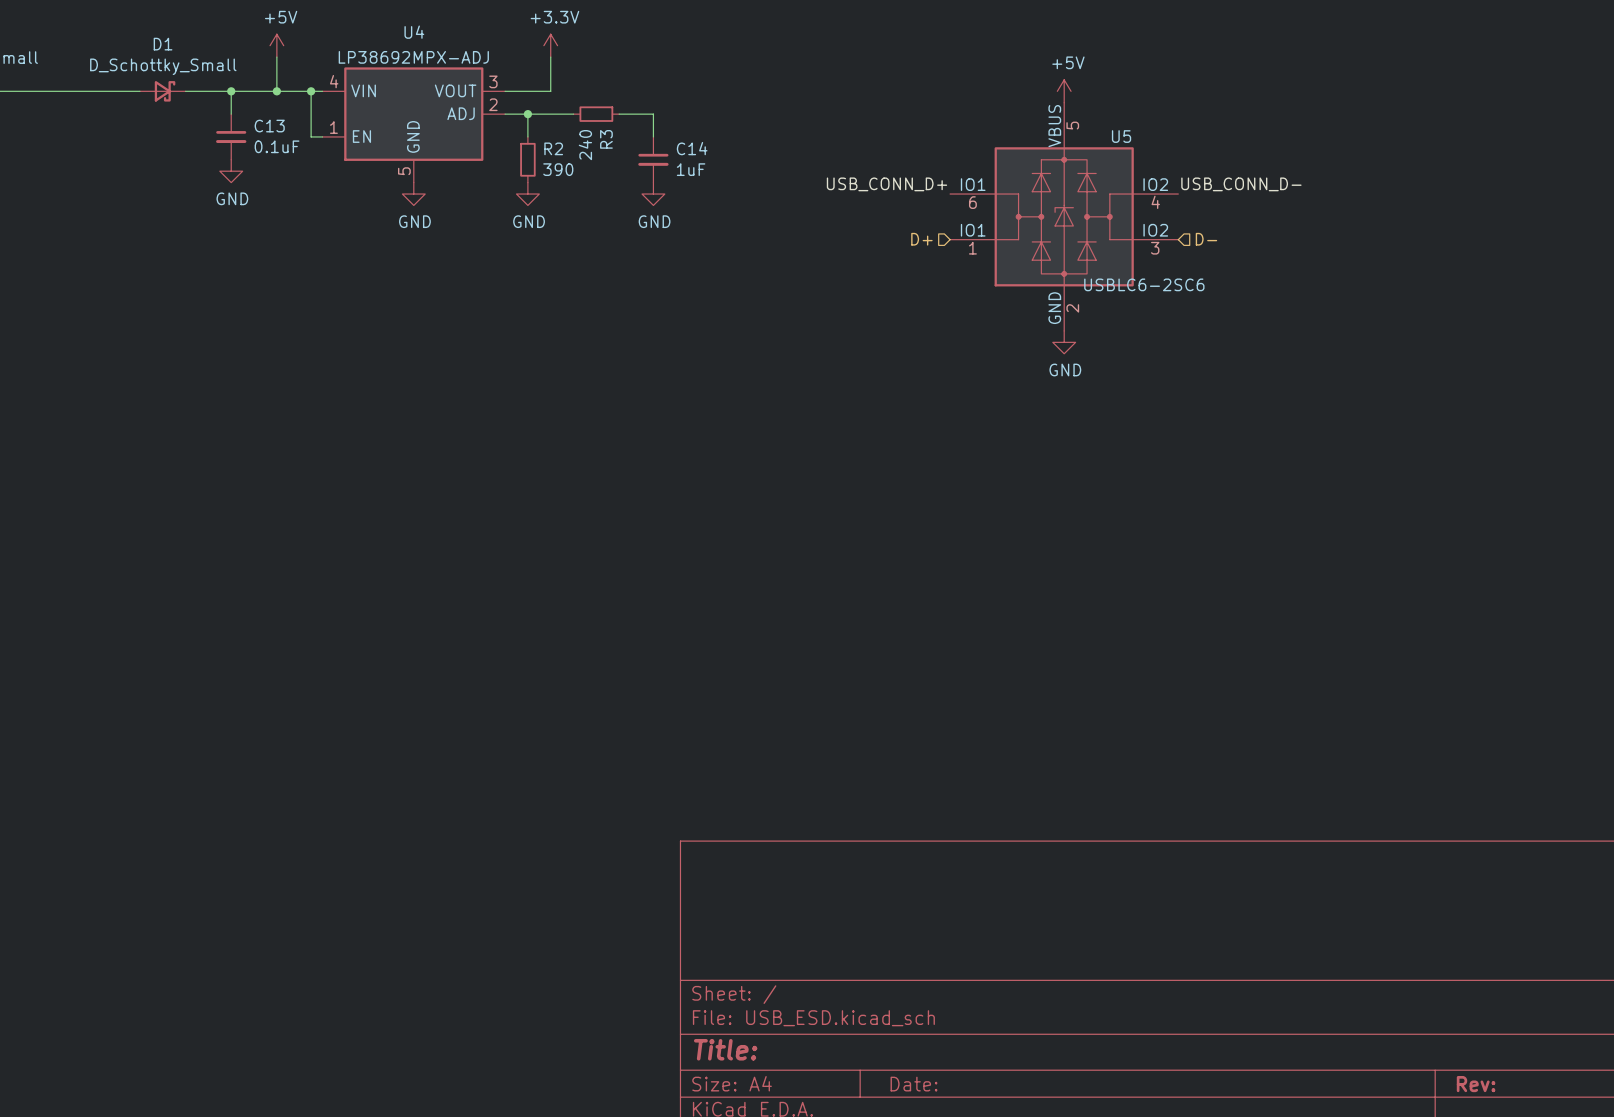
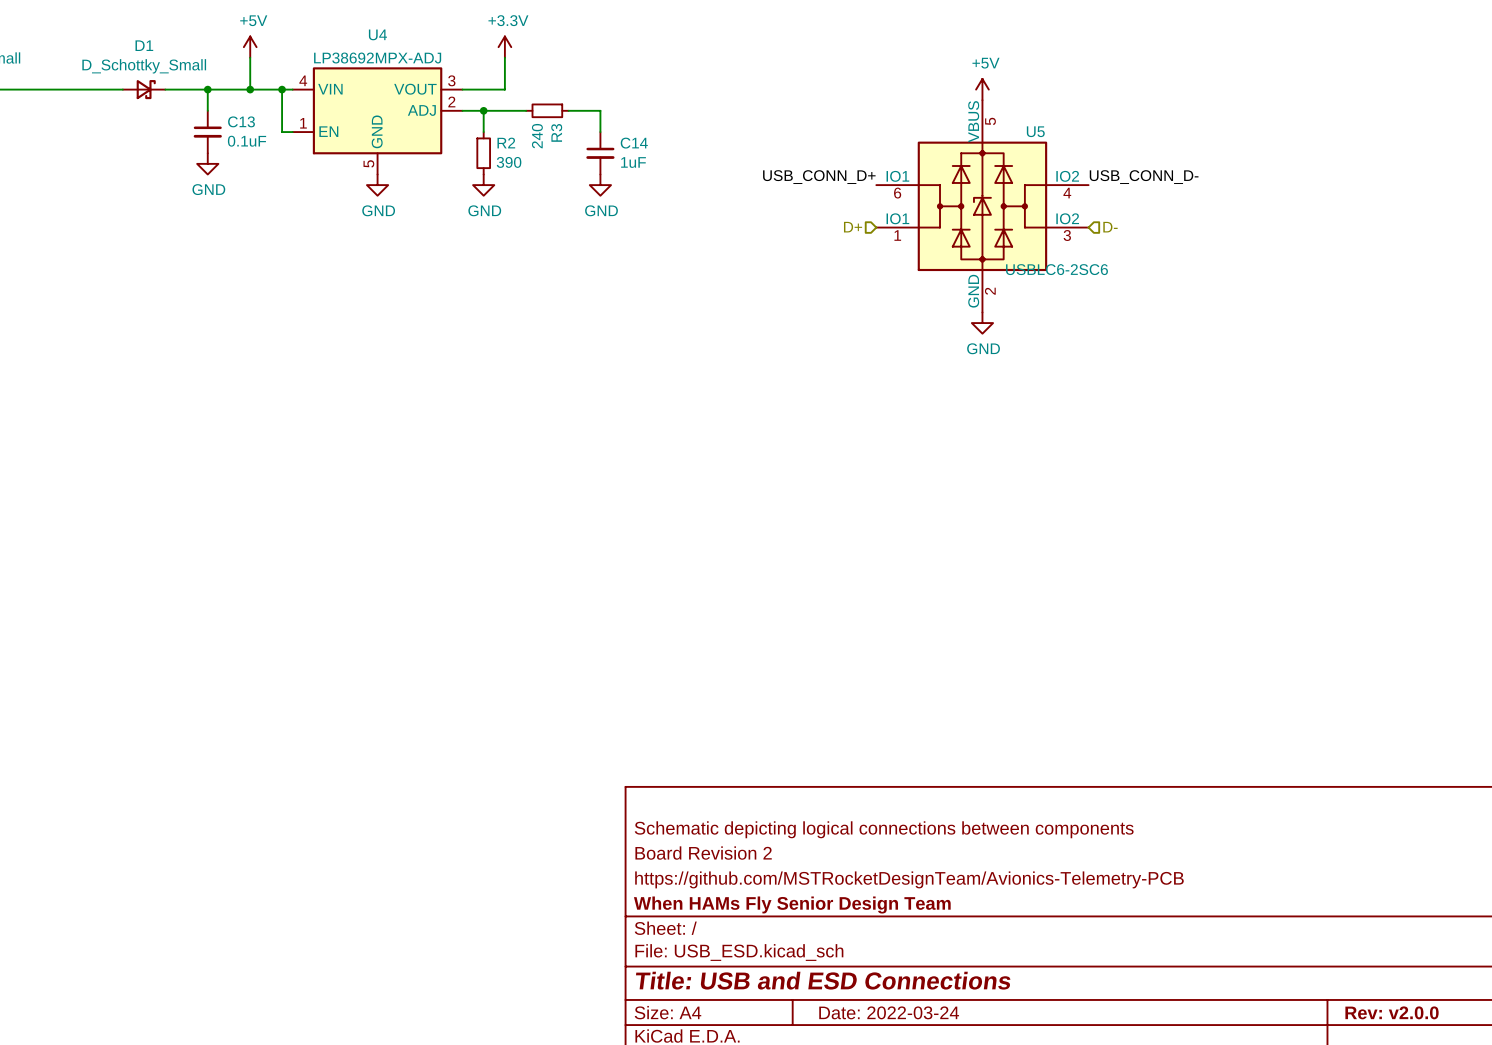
title block: none -> Schematic depicting logical connections between components (884, 829)
title block: none -> Board Revision 2 (703, 853)
title block: none -> https://github.com/MSTRocketDesignTeam/Avionics-Telemetry-PCB (909, 879)
title block: none -> When HAMs Fly Senior Design Team (792, 905)
title block: Title: (725, 1049) -> Title: USB and ESD Connections (823, 980)
title block: Date: (914, 1084) -> Date: 2022-03-24 (889, 1012)
title block: Rev: (1476, 1084) -> Rev: v2.0.0 (1392, 1012)

